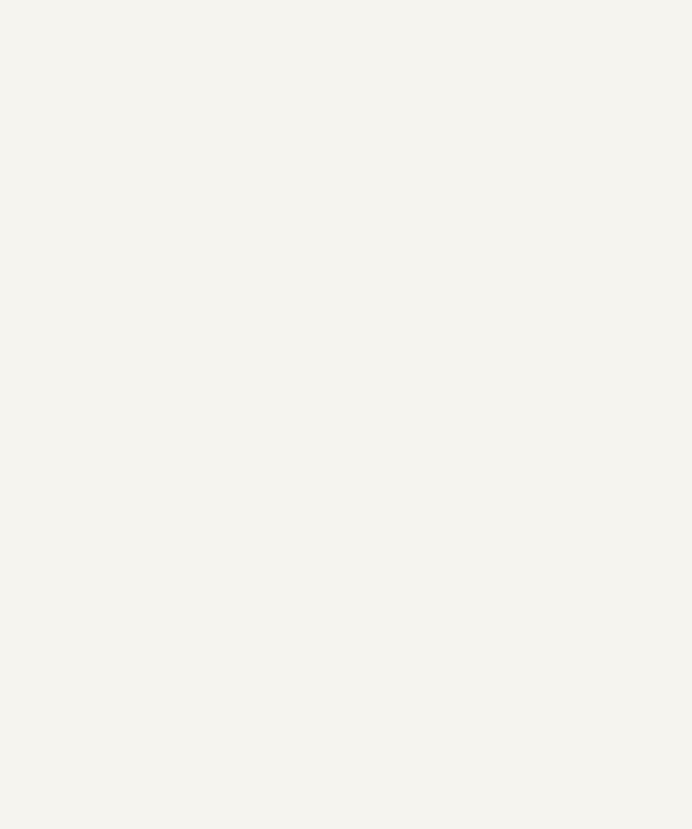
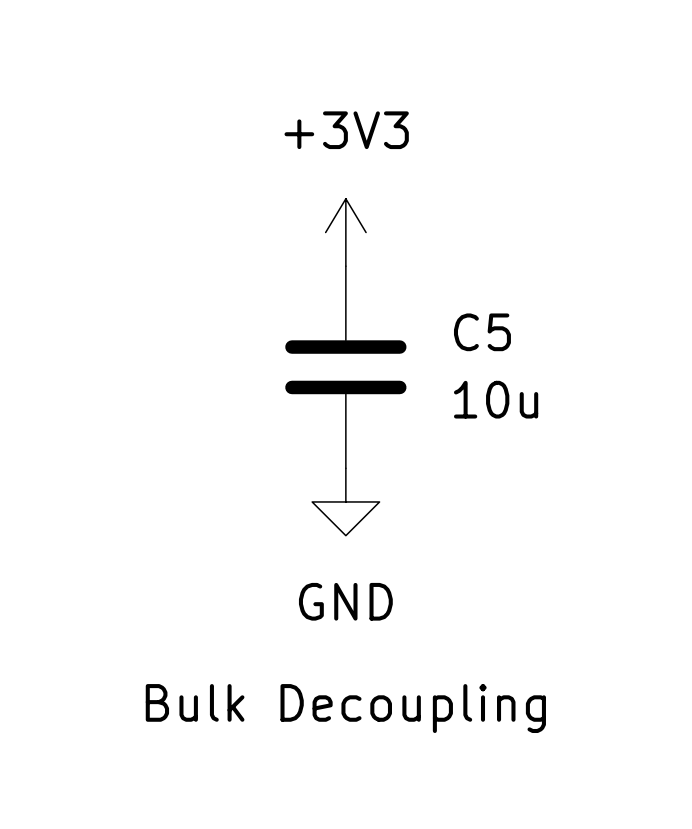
power symbol: none -> +3V3 (345, 232)
C5: none -> 10u (345, 367)
power symbol: none -> GND (345, 501)
text: none -> Bulk Decoupling (345, 708)

